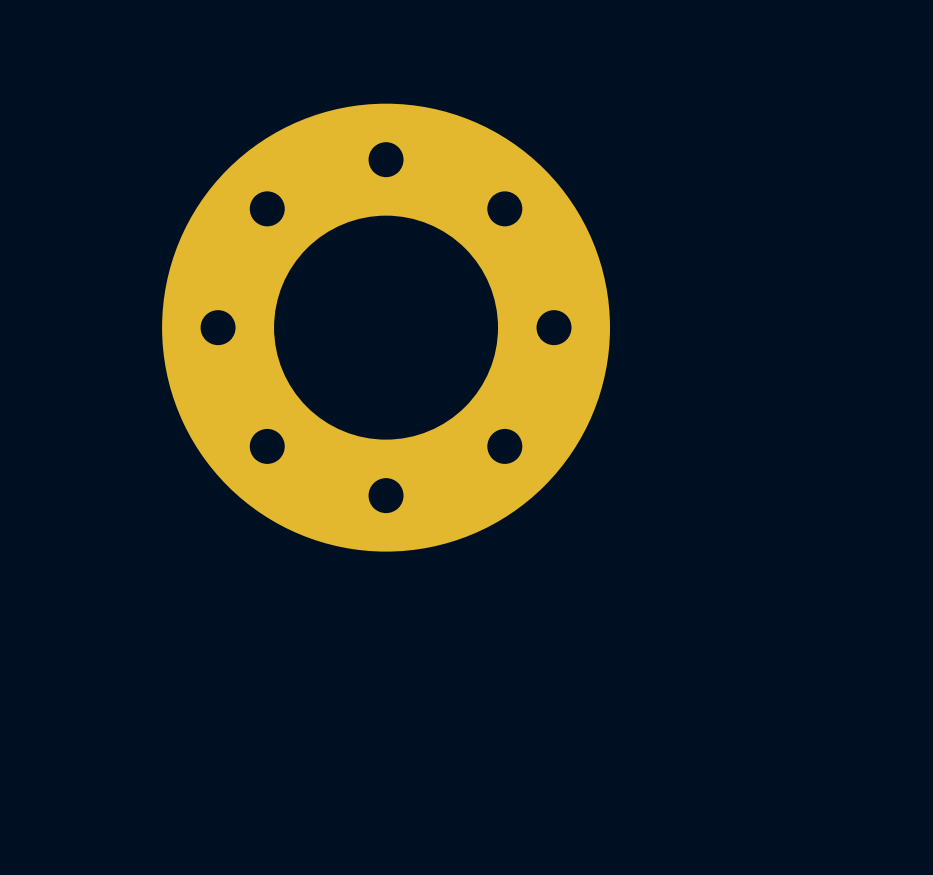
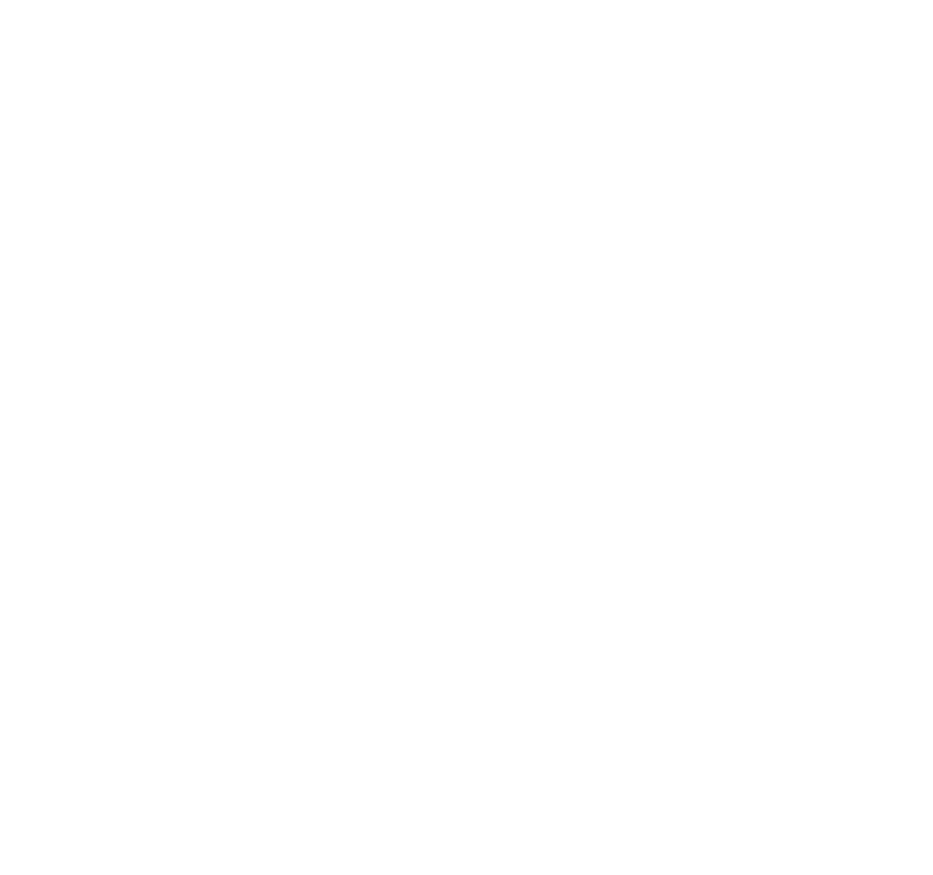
part: (386, 327) -> none

